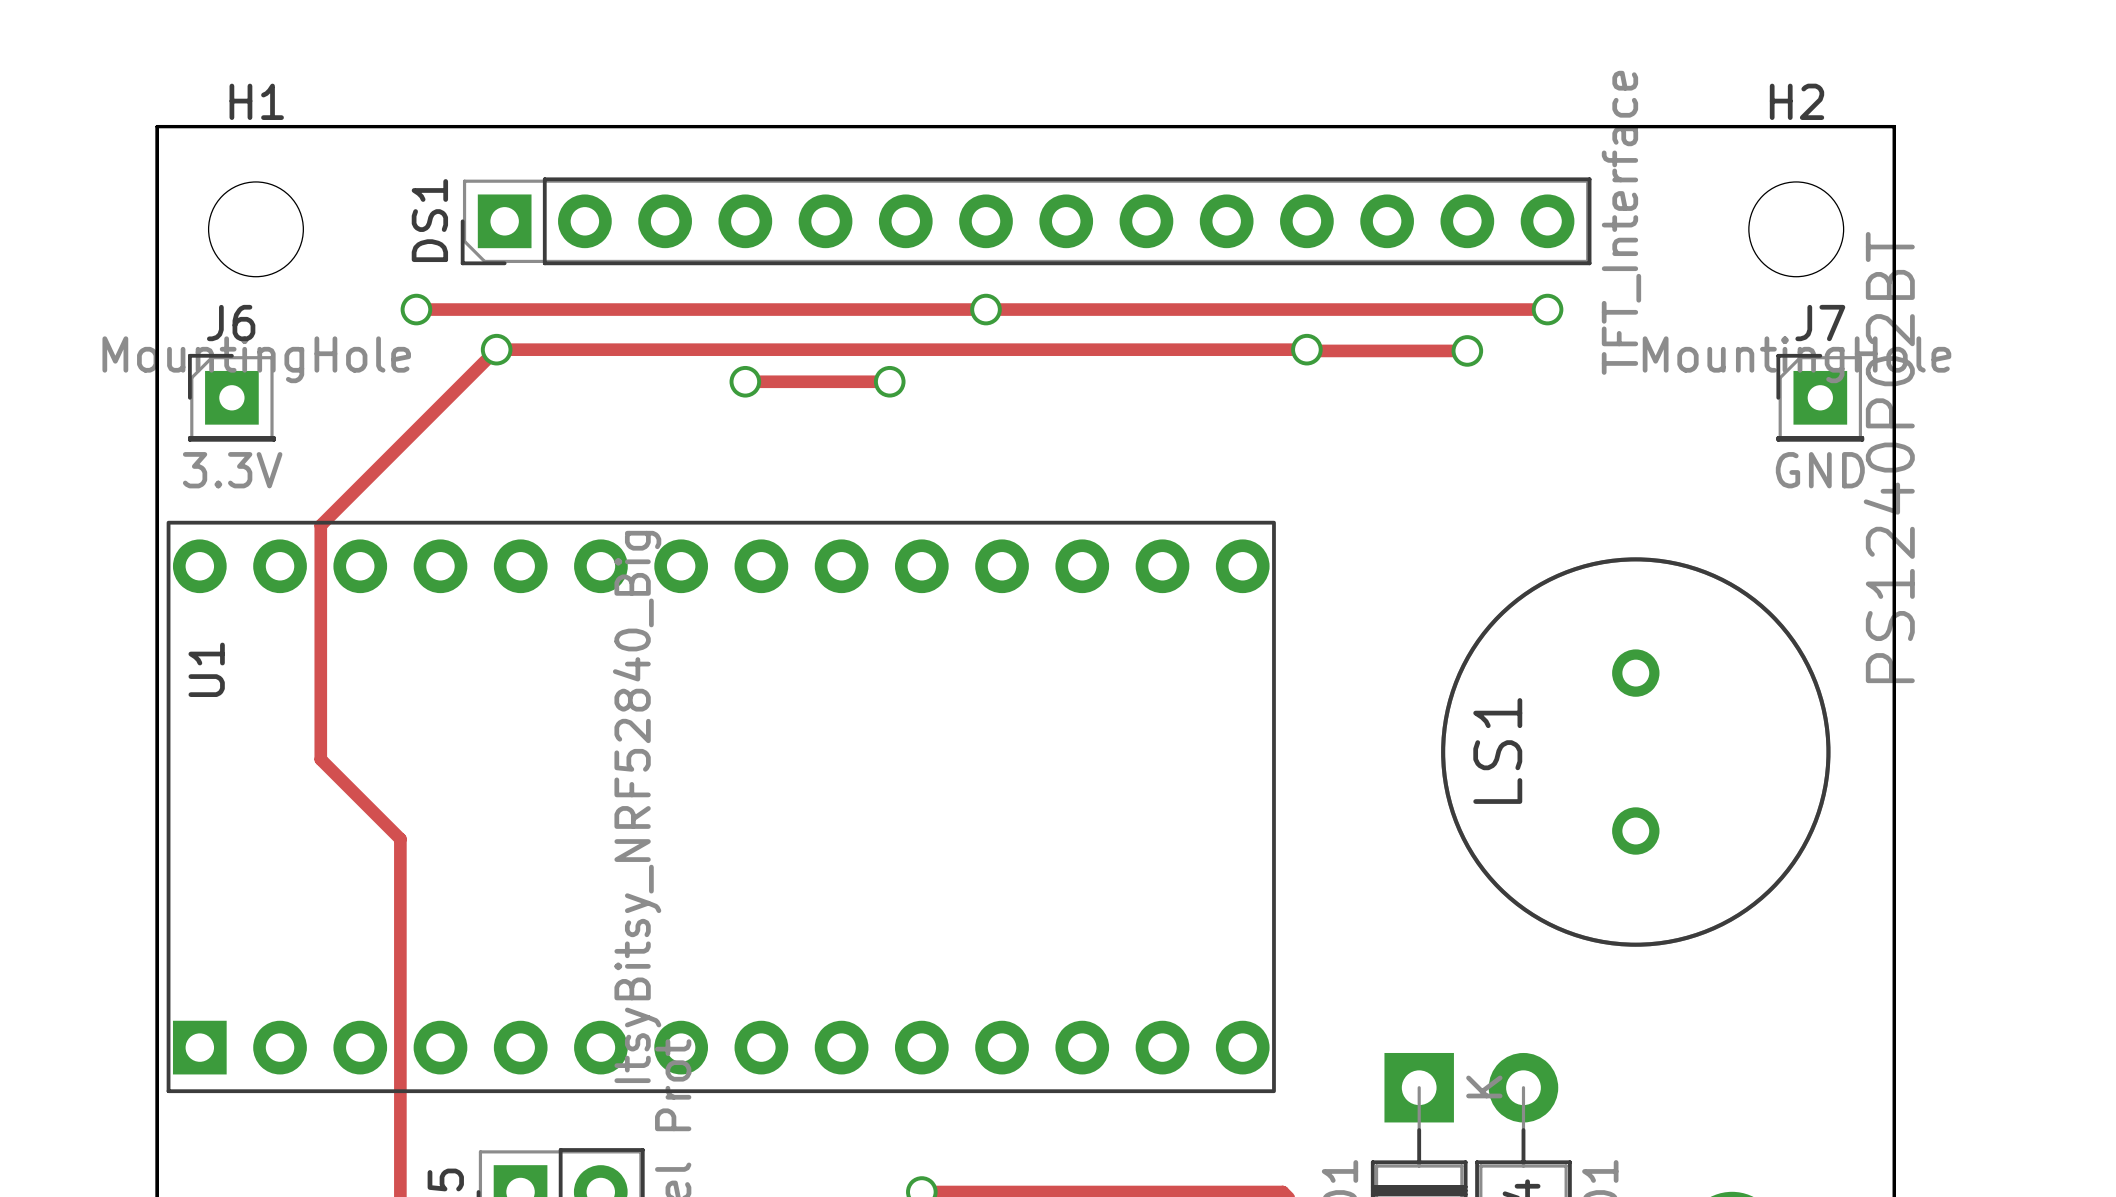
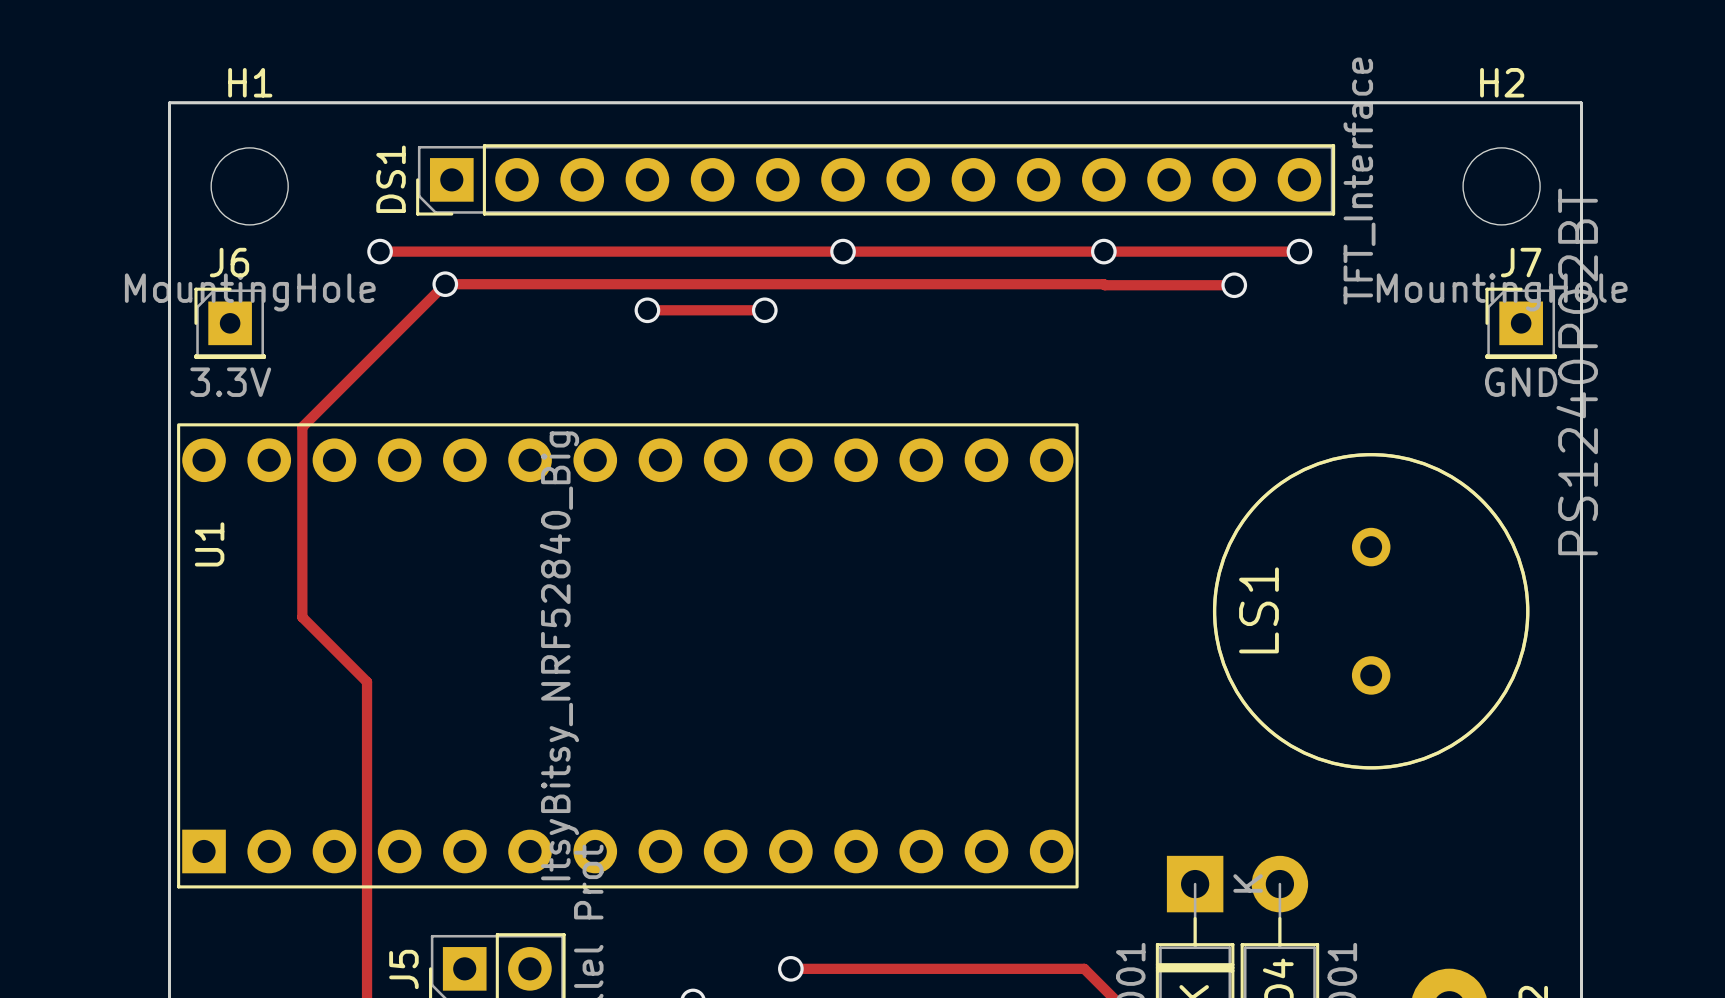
via position: (1306, 349) -> (1103, 251)

